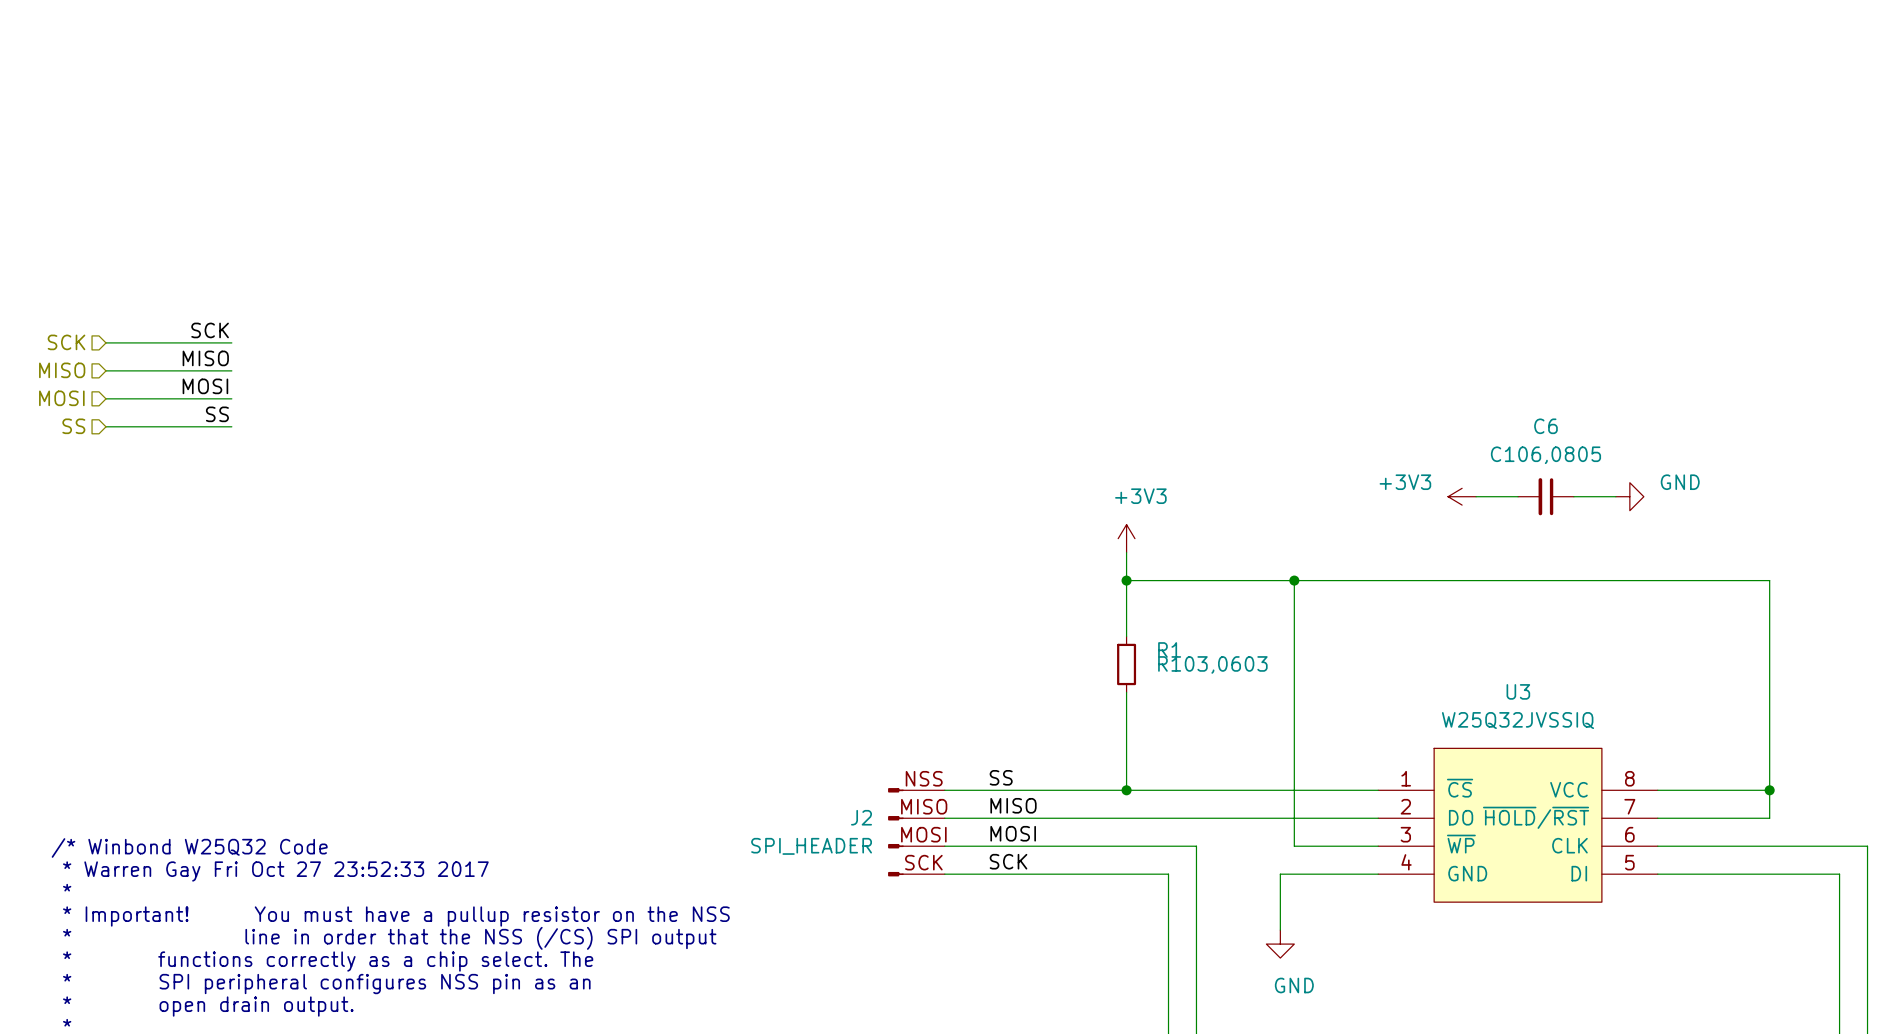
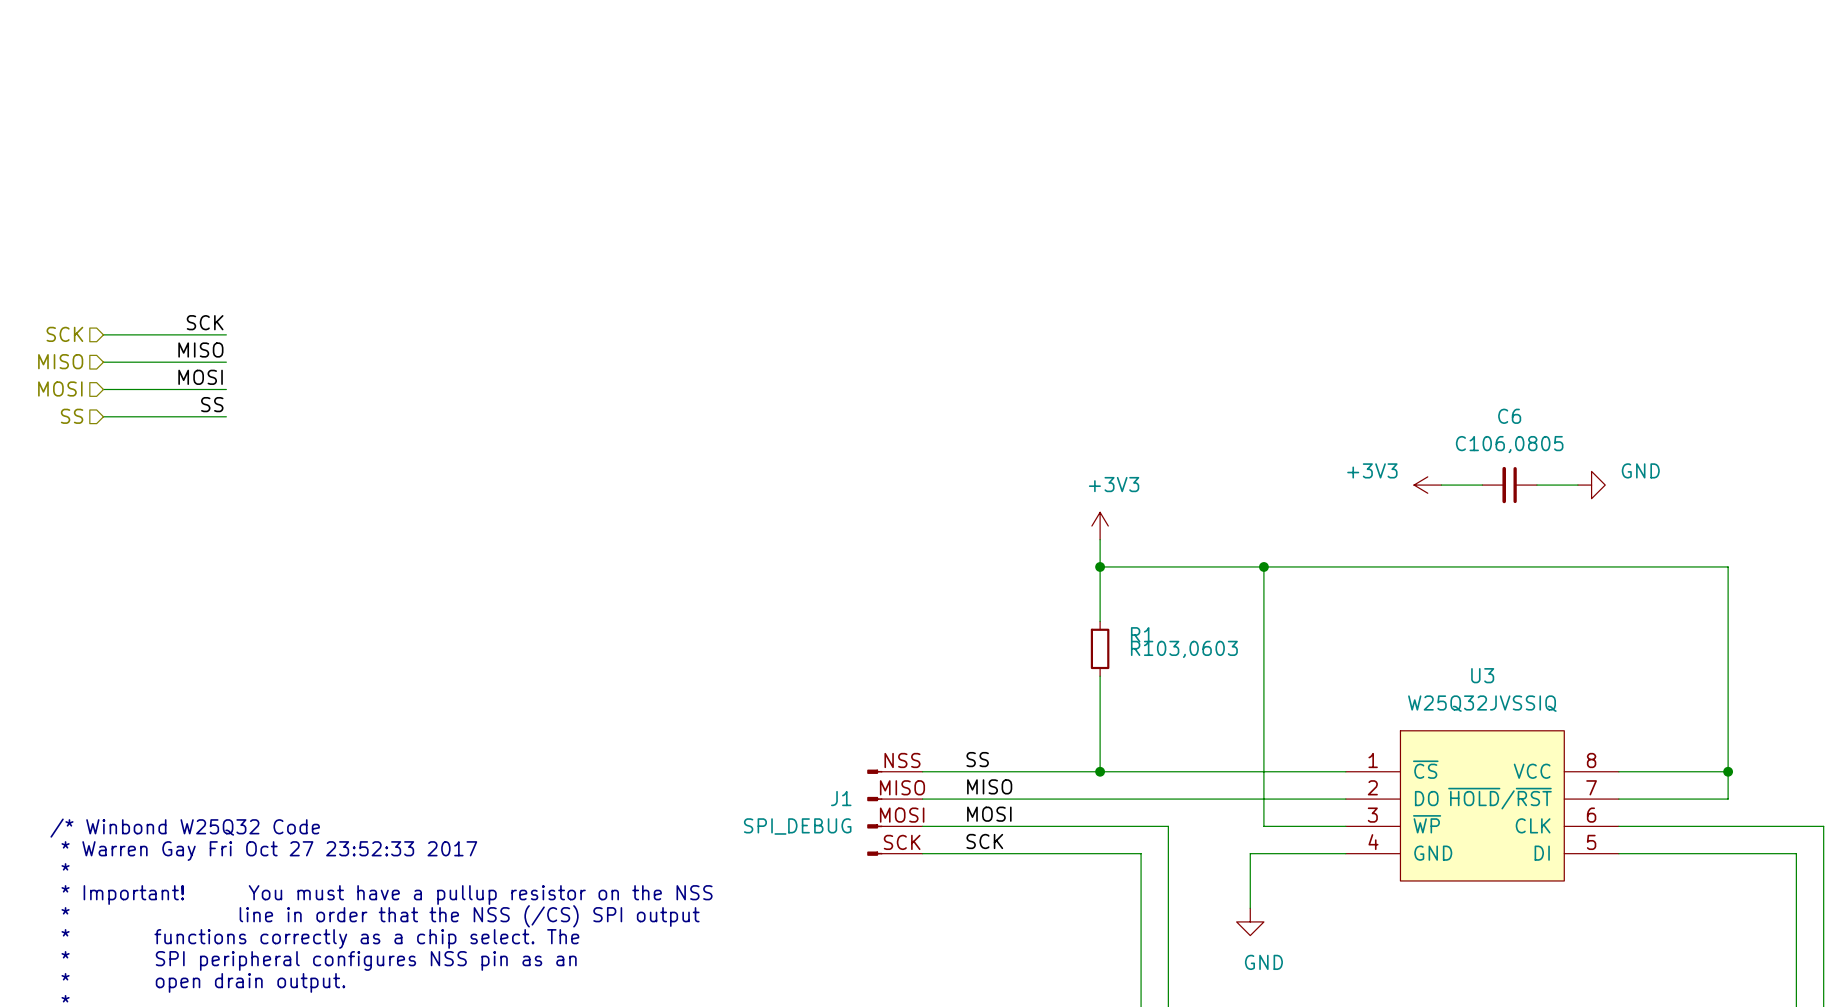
J2 name: J2 (861, 817) -> J1 (841, 798)
J2 value: SPI_HEADER (811, 846) -> SPI_DEBUG (797, 826)

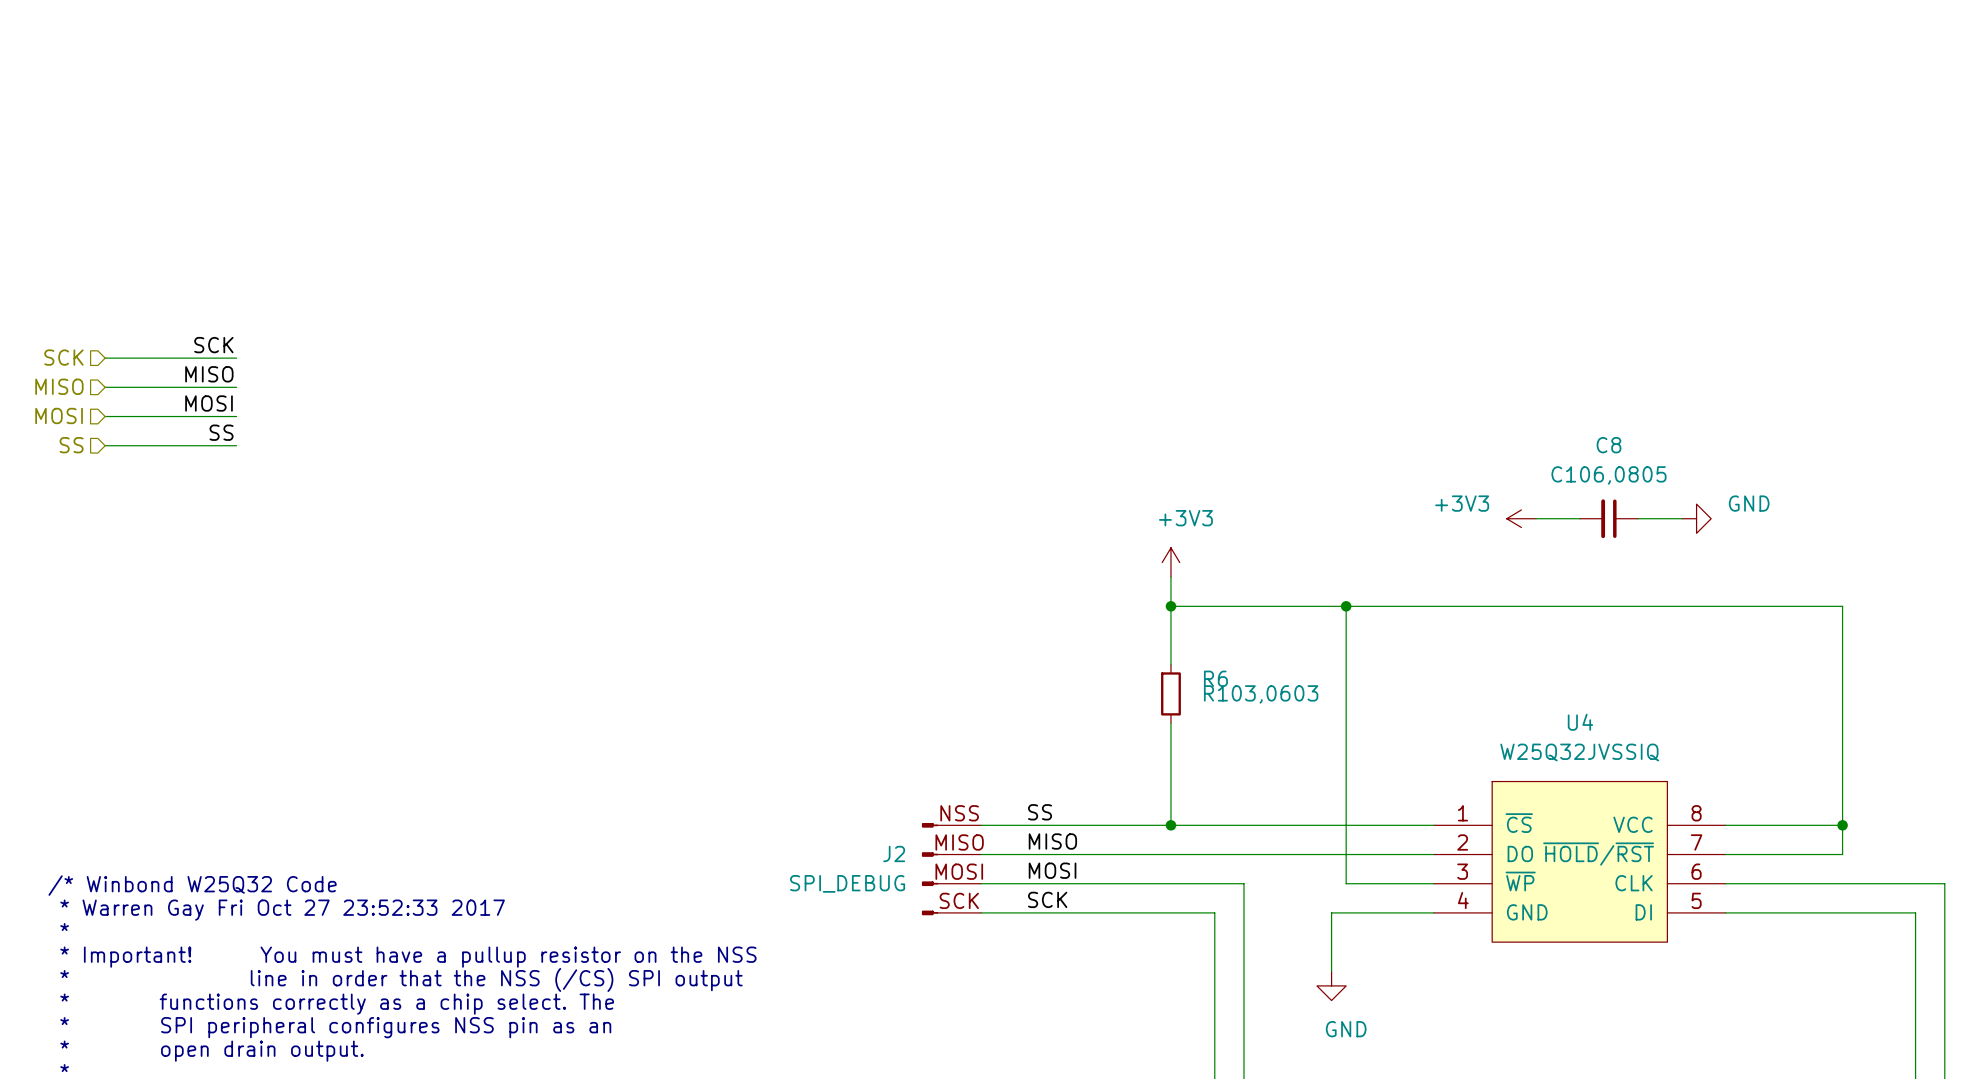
C6 name: C6 (1509, 416) -> C8 (1608, 445)
R1 name: R1 (1142, 634) -> R6 (1215, 678)
U3 name: U3 (1482, 675) -> U4 (1580, 722)
J1 name: J1 (841, 798) -> J2 (894, 853)

